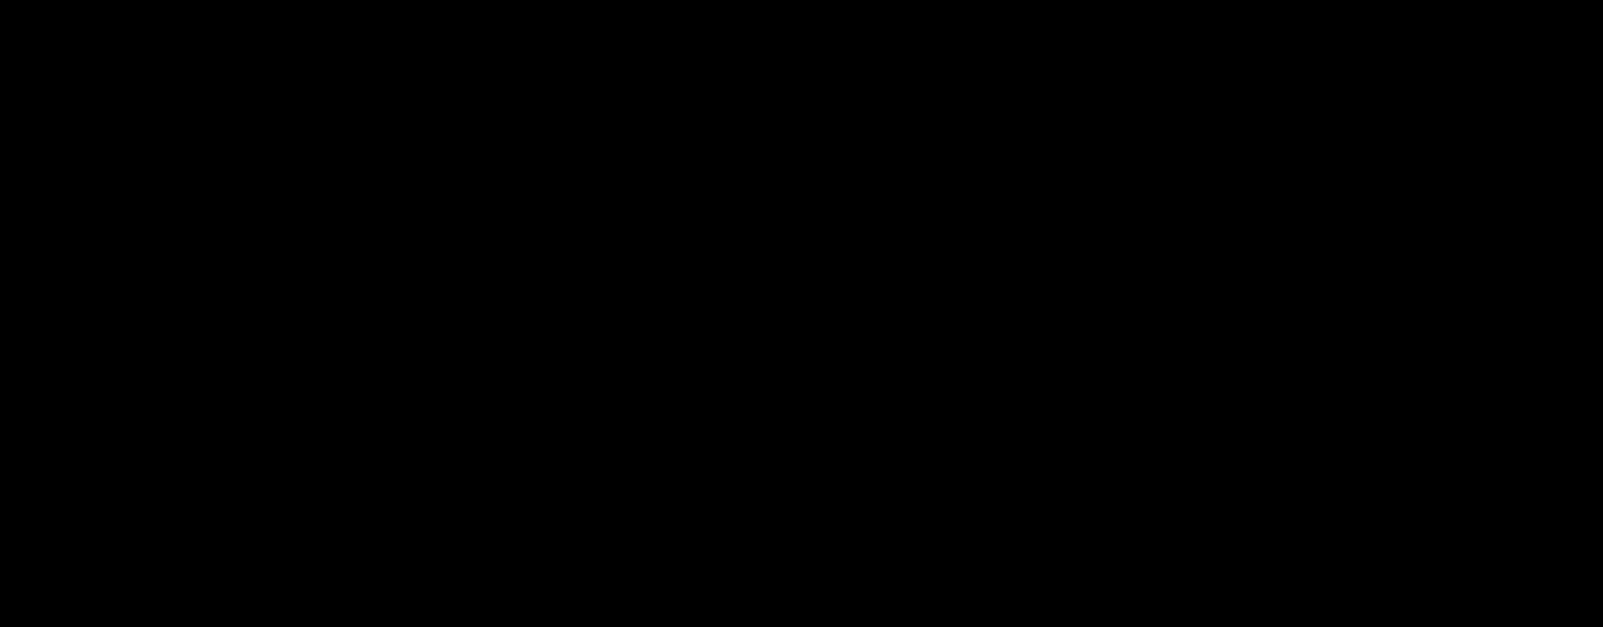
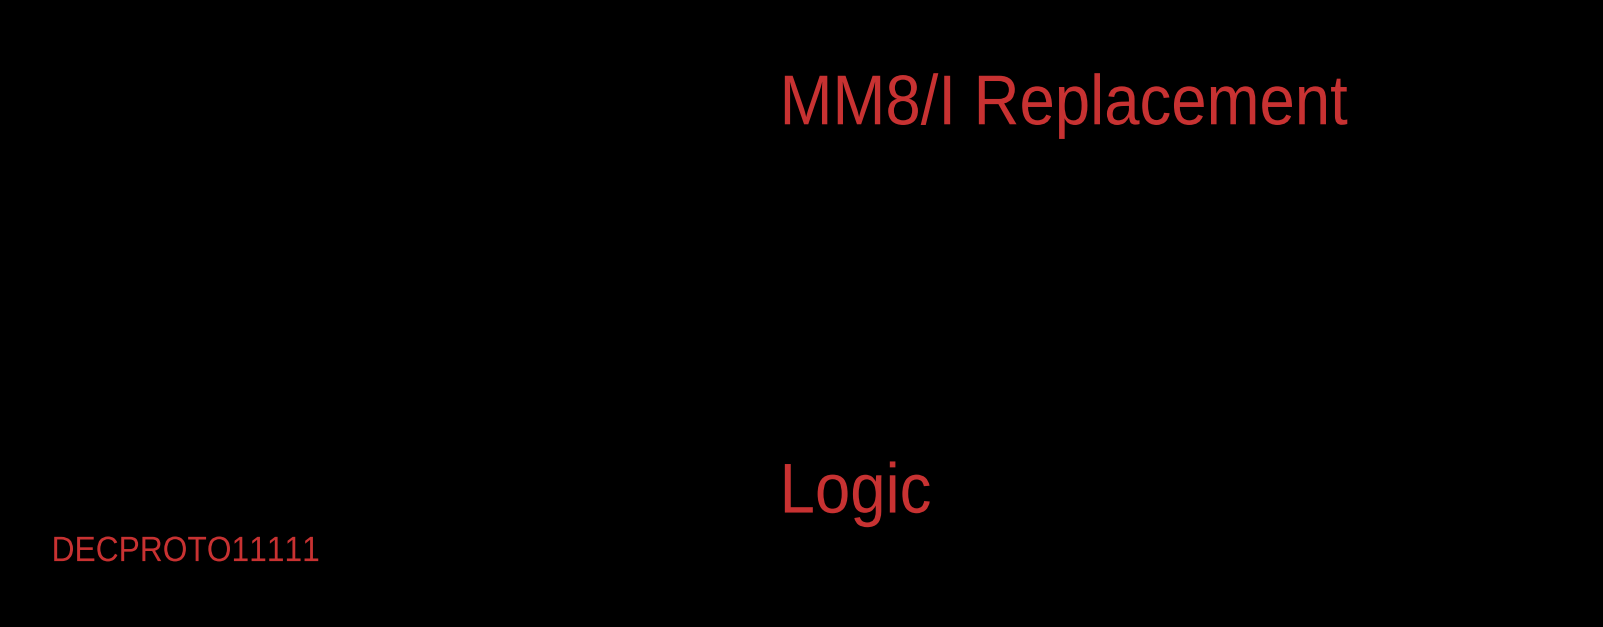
text: none -> MM8/I Replacement (1066, 106)
text: none -> Logic (857, 494)
part: none -> DECPROTO11111 (186, 548)

